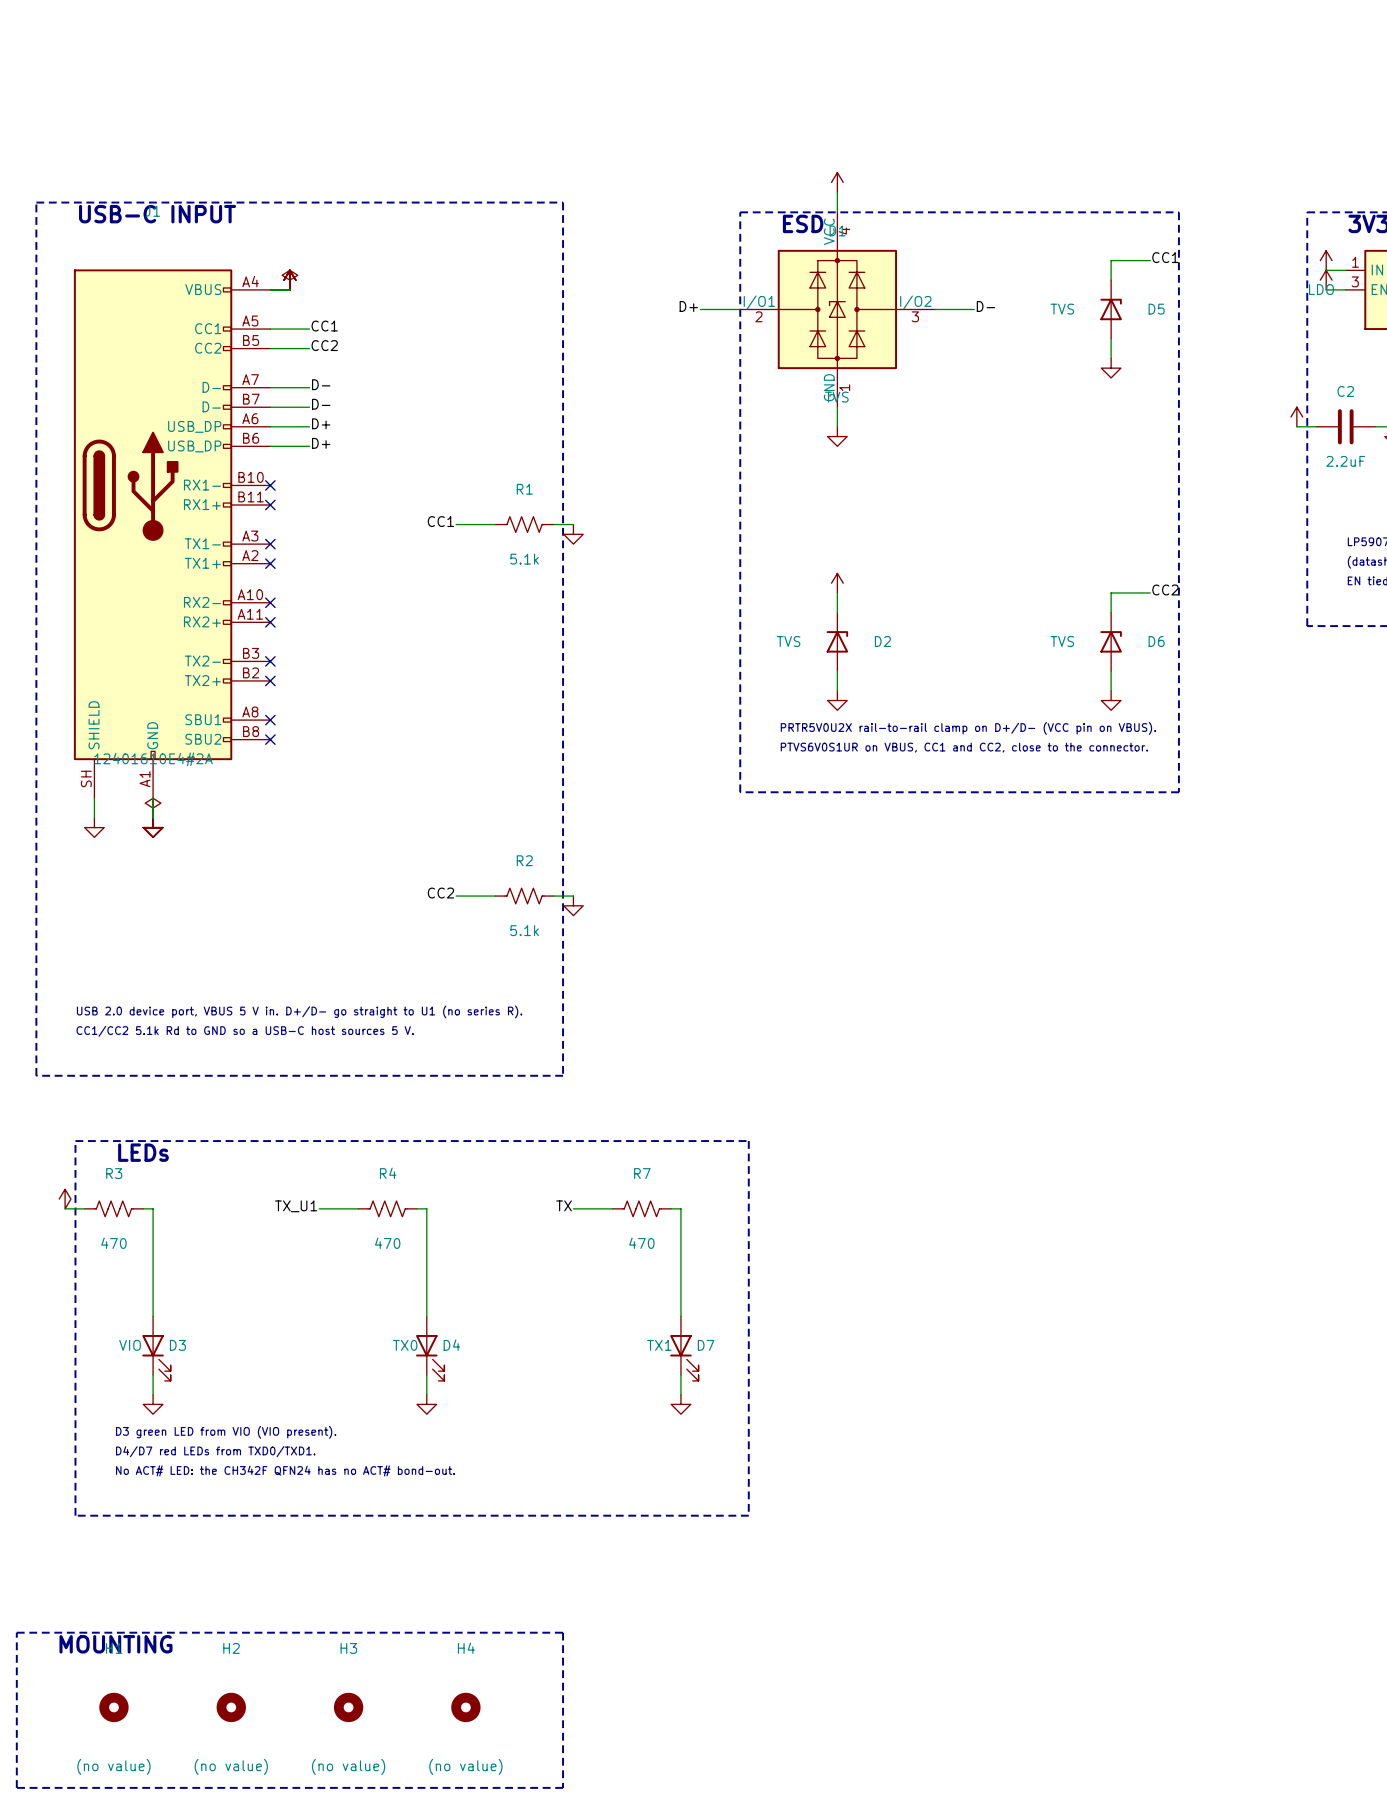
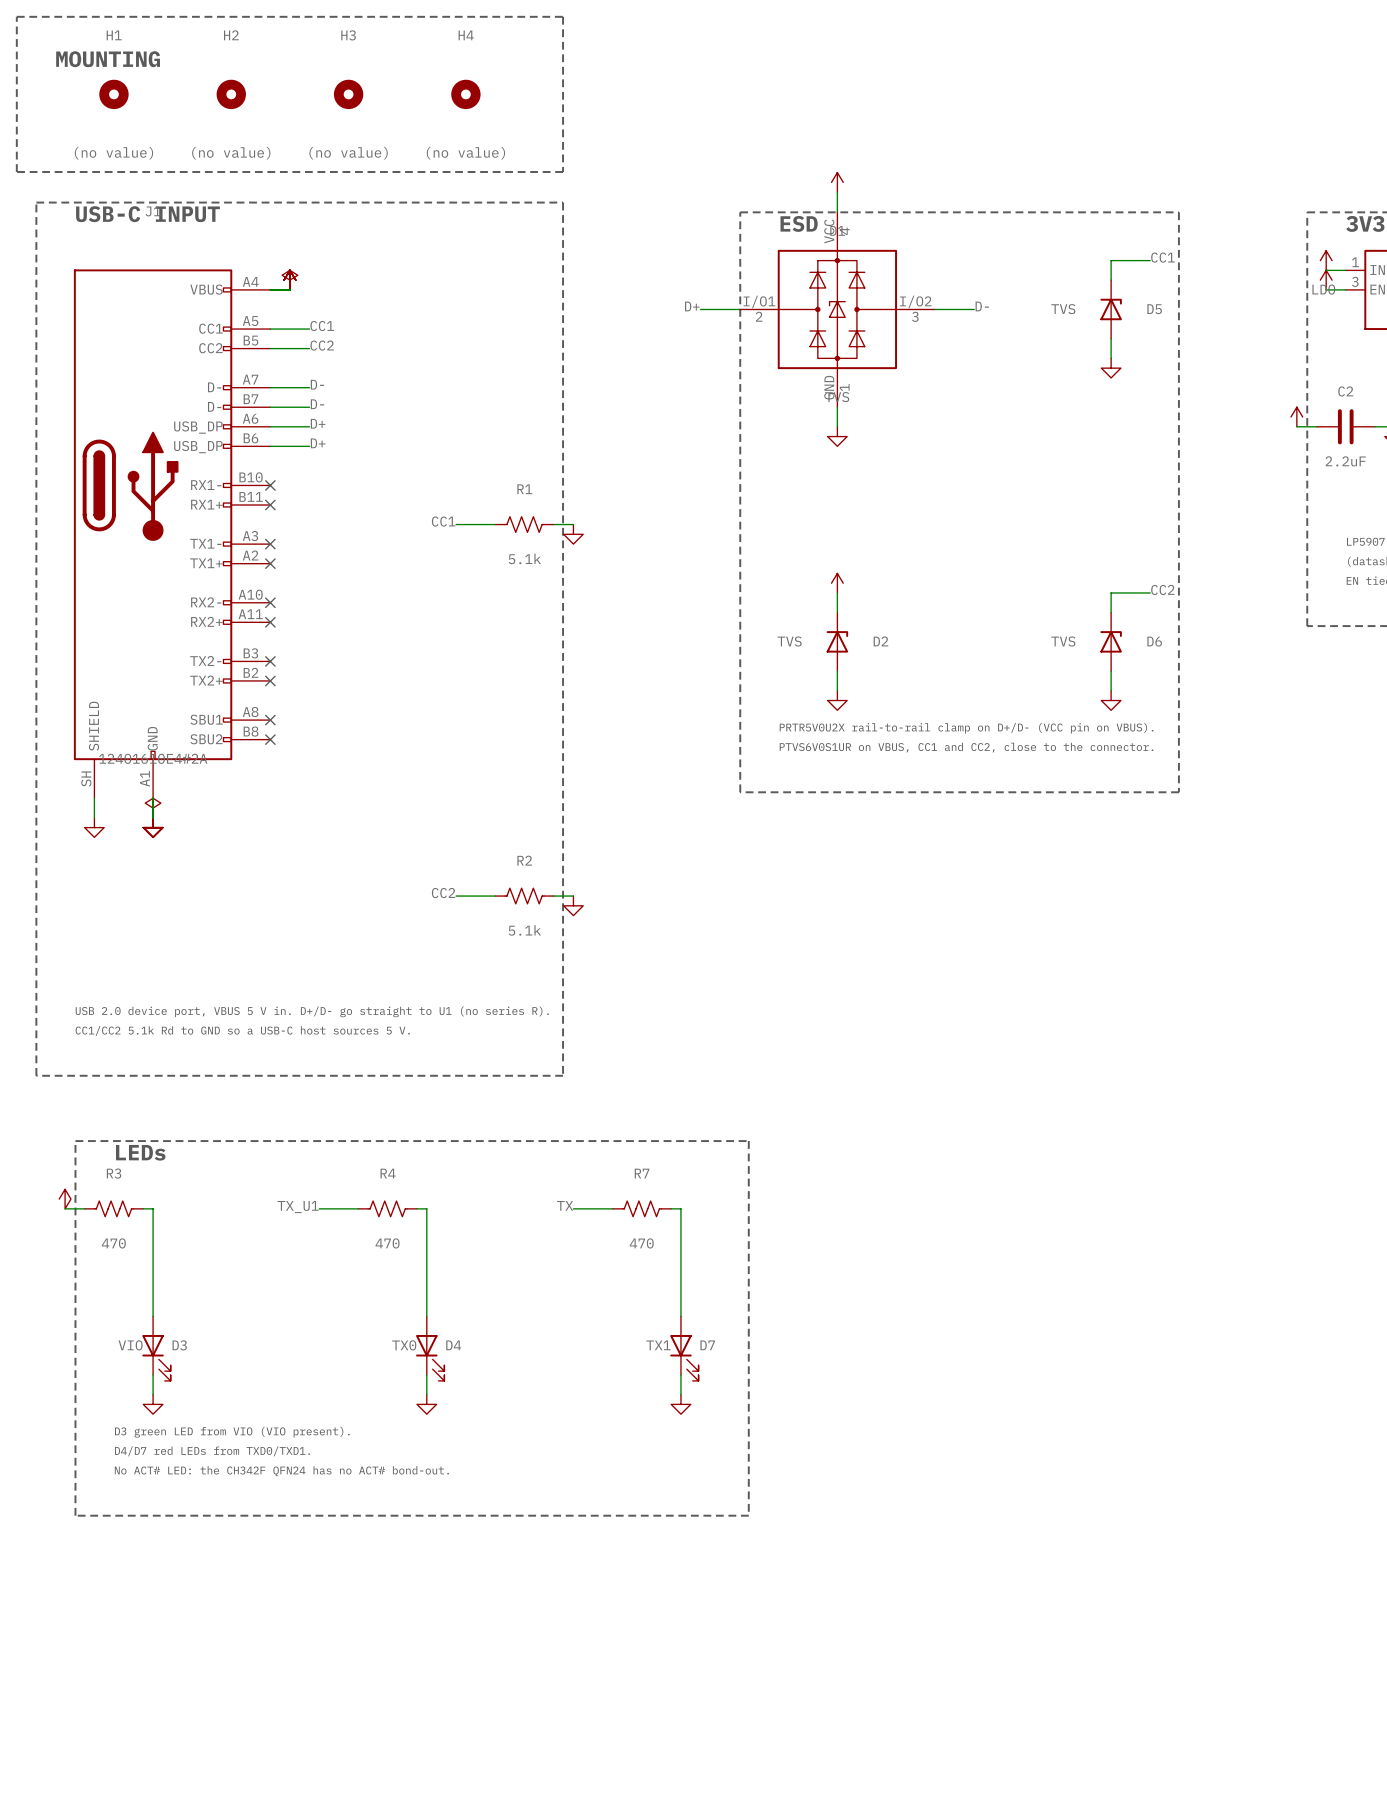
line: none -> (16, 16) (563, 16) (563, 172) (16, 172) (16, 16)
text: none -> MOUNTING (108, 59)
line: (16, 1632) (563, 1632) (563, 1787) (16, 1787) (16, 1632) -> none
text: MOUNTING (115, 1644) -> none
H1 position: (113, 1707) -> (113, 94)
H2 position: (231, 1707) -> (231, 94)
H3 position: (348, 1707) -> (348, 94)
H4 position: (465, 1707) -> (465, 94)

